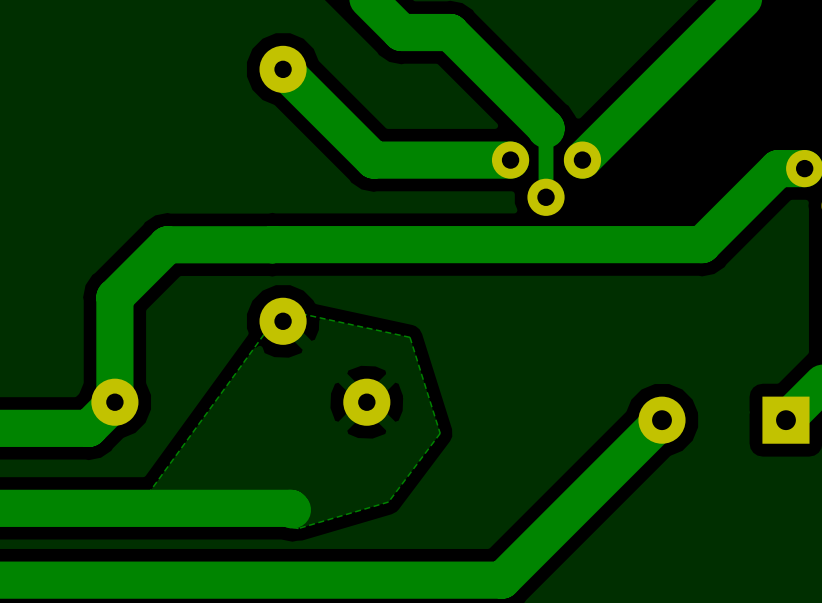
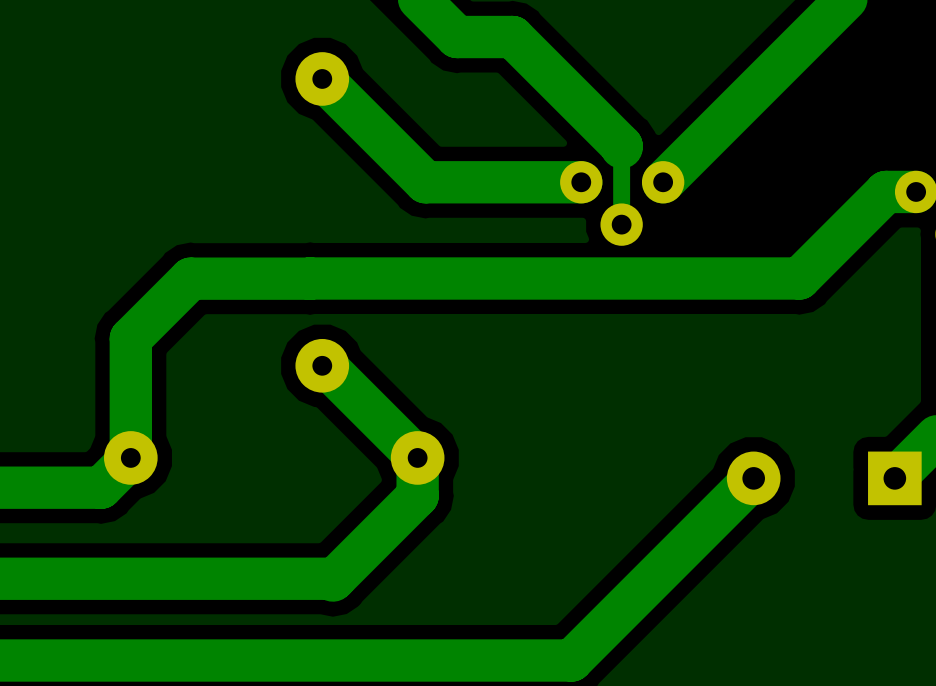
zone outline: (282, 309) (141, 502) (298, 528) (388, 502) (440, 433) (409, 337) (282, 309) -> none
track: none -> (325, 365) (417, 457) (417, 495) (334, 578) (331, 578)

